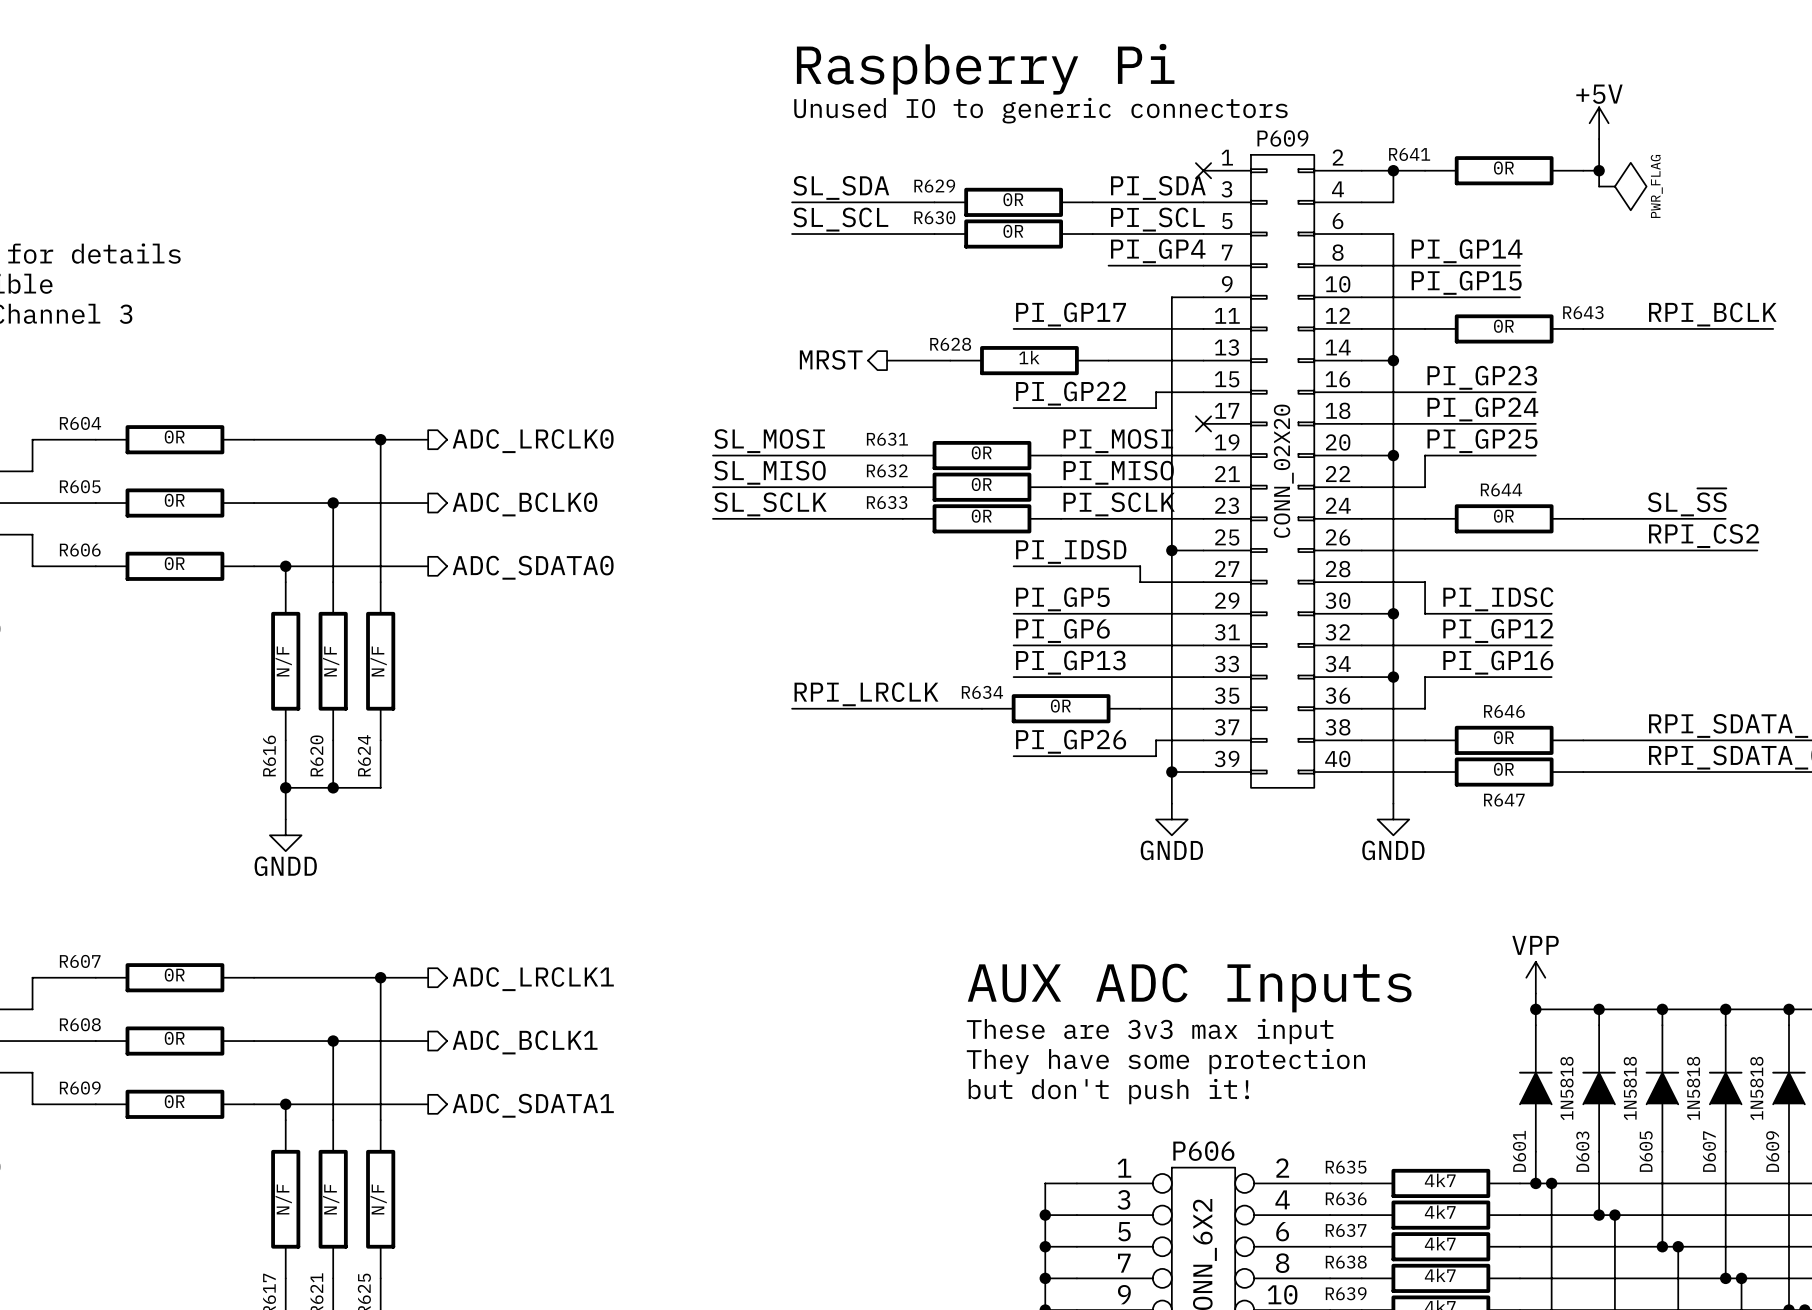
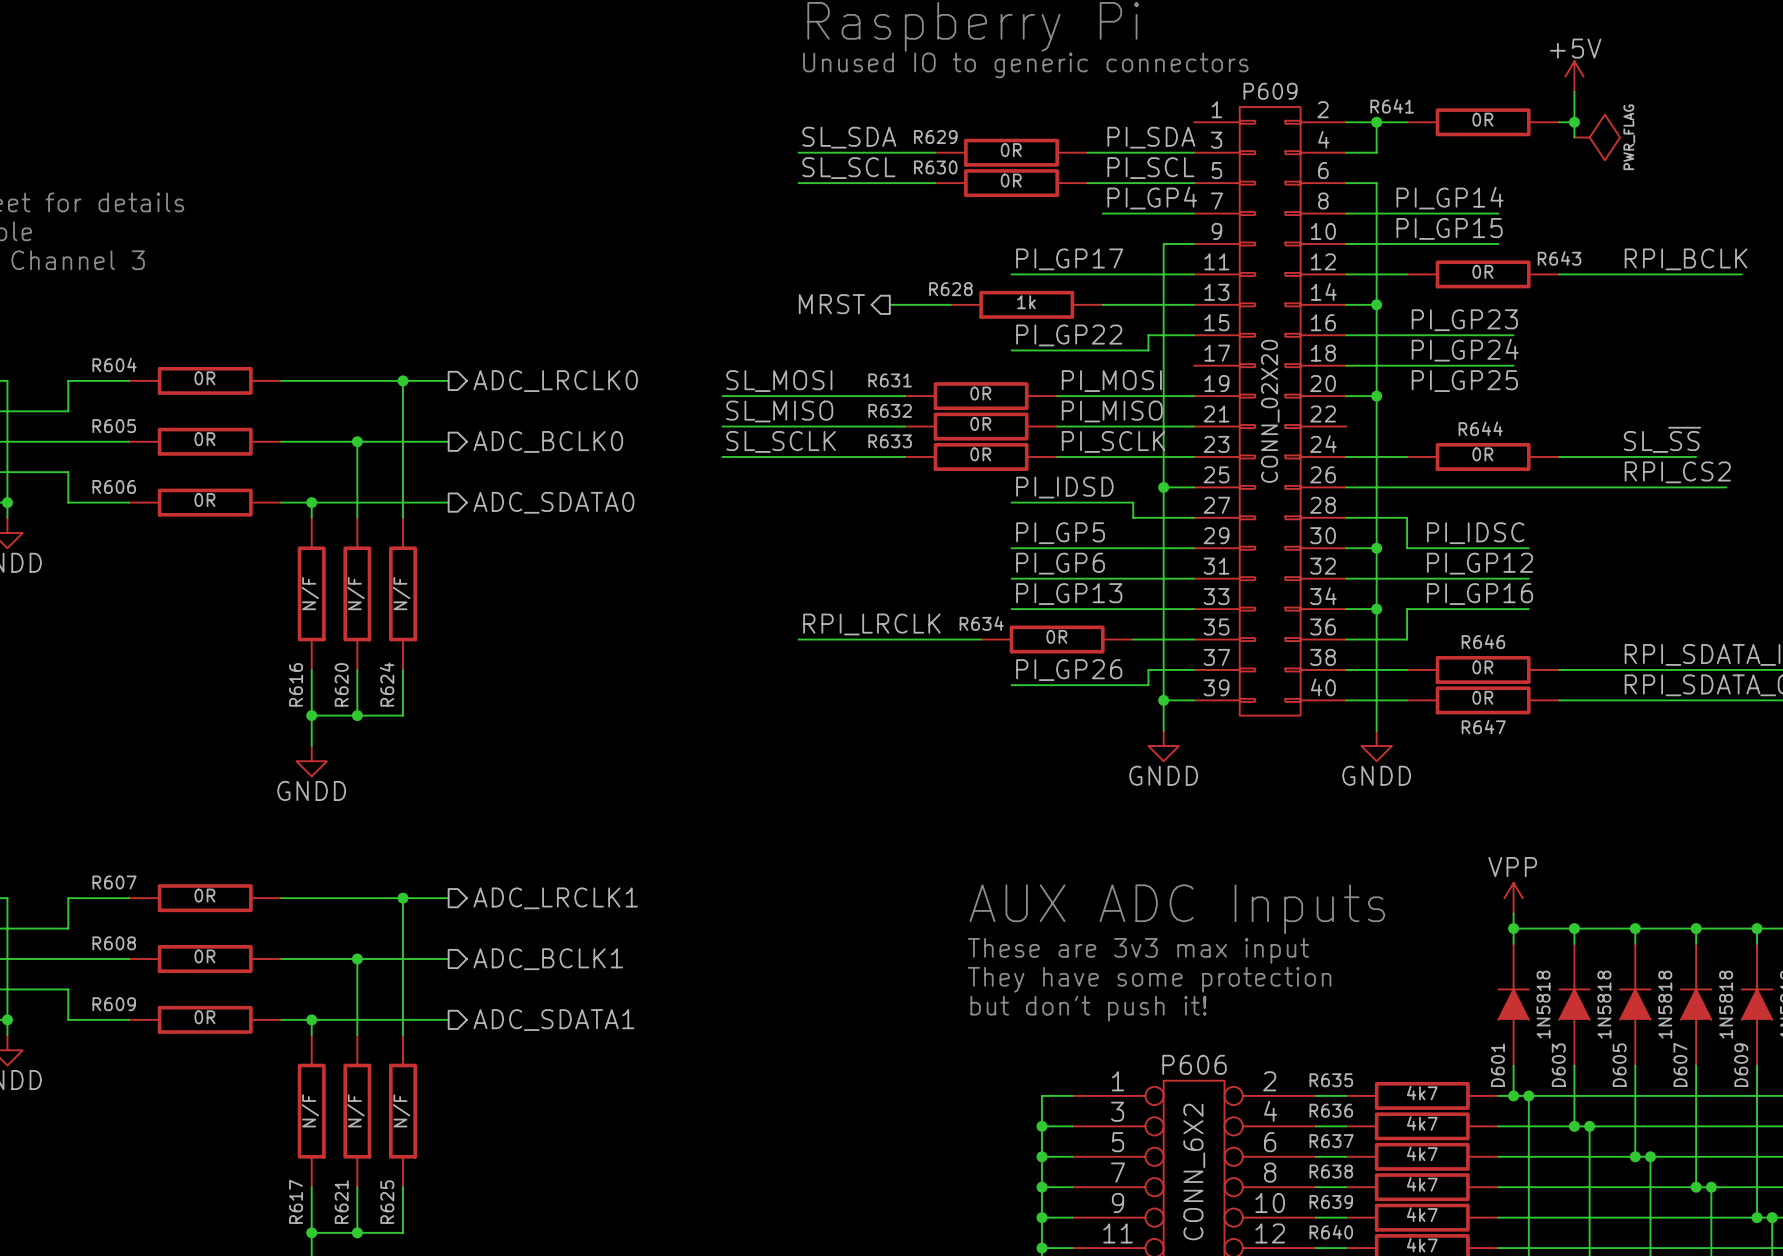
no-connect mark: (1203, 170) -> none
no-connect mark: (1203, 423) -> none
wire: (1535, 455) (1425, 455) (1425, 487) (1361, 487) -> none

